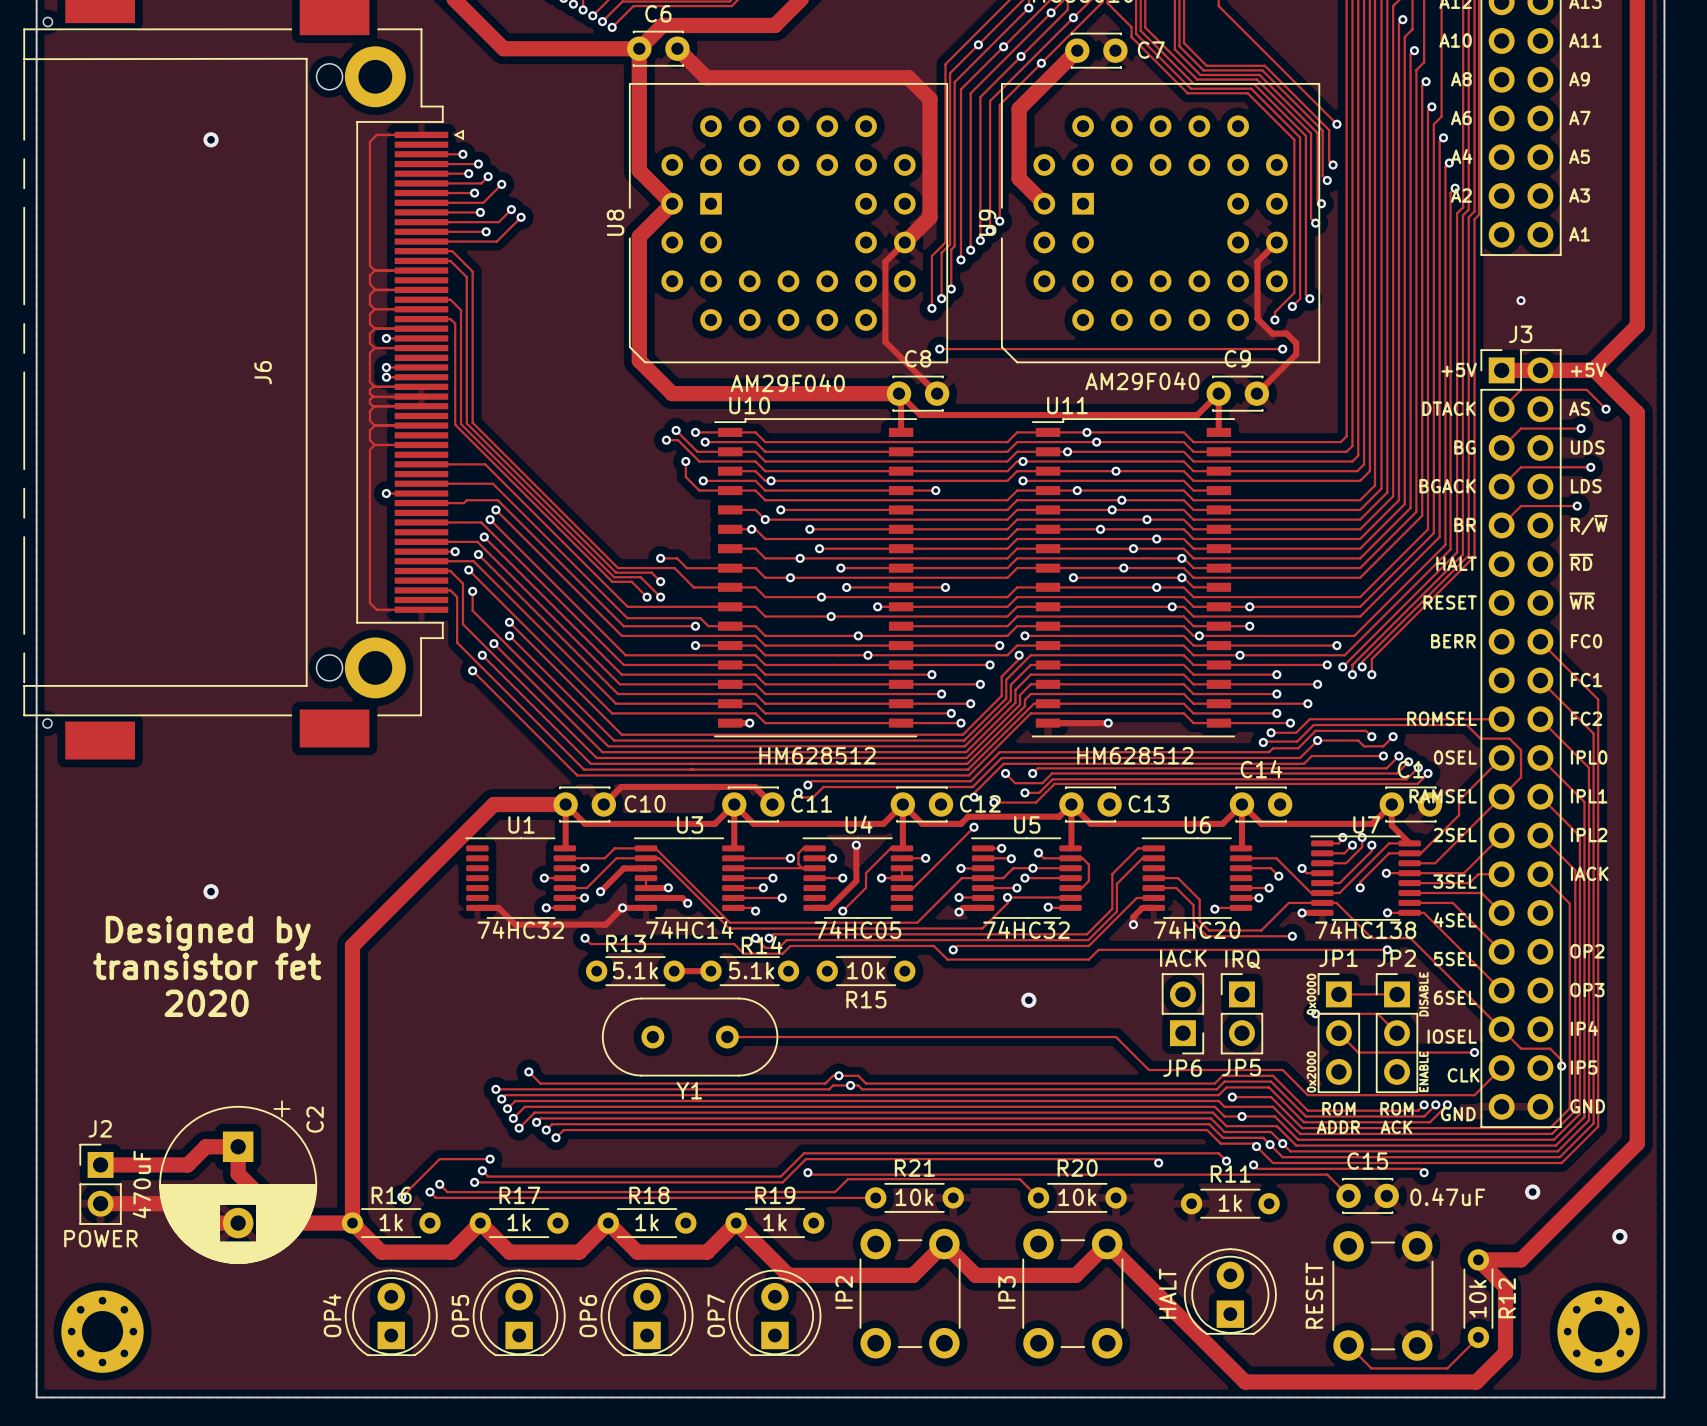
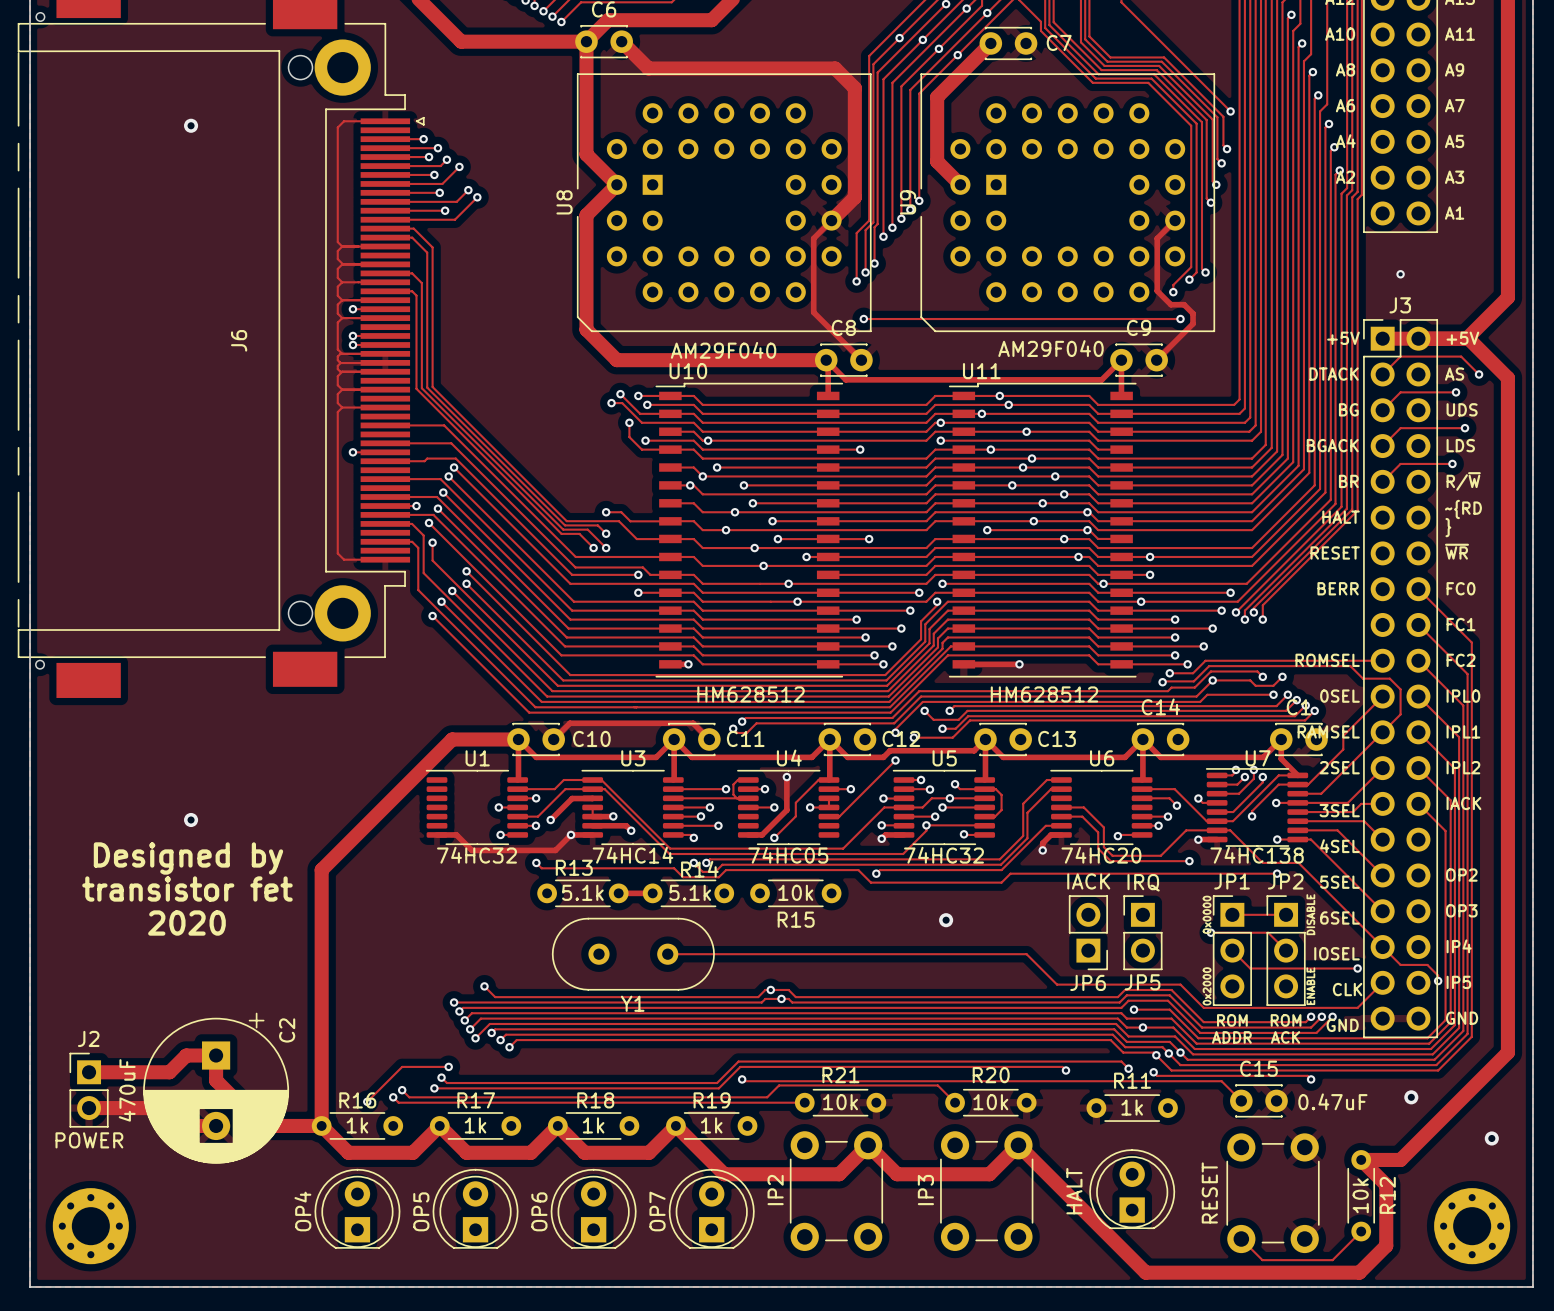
text: ~{RD} (1581, 562) -> ~{RD (1463, 509)
text: none -> } (1448, 527)

